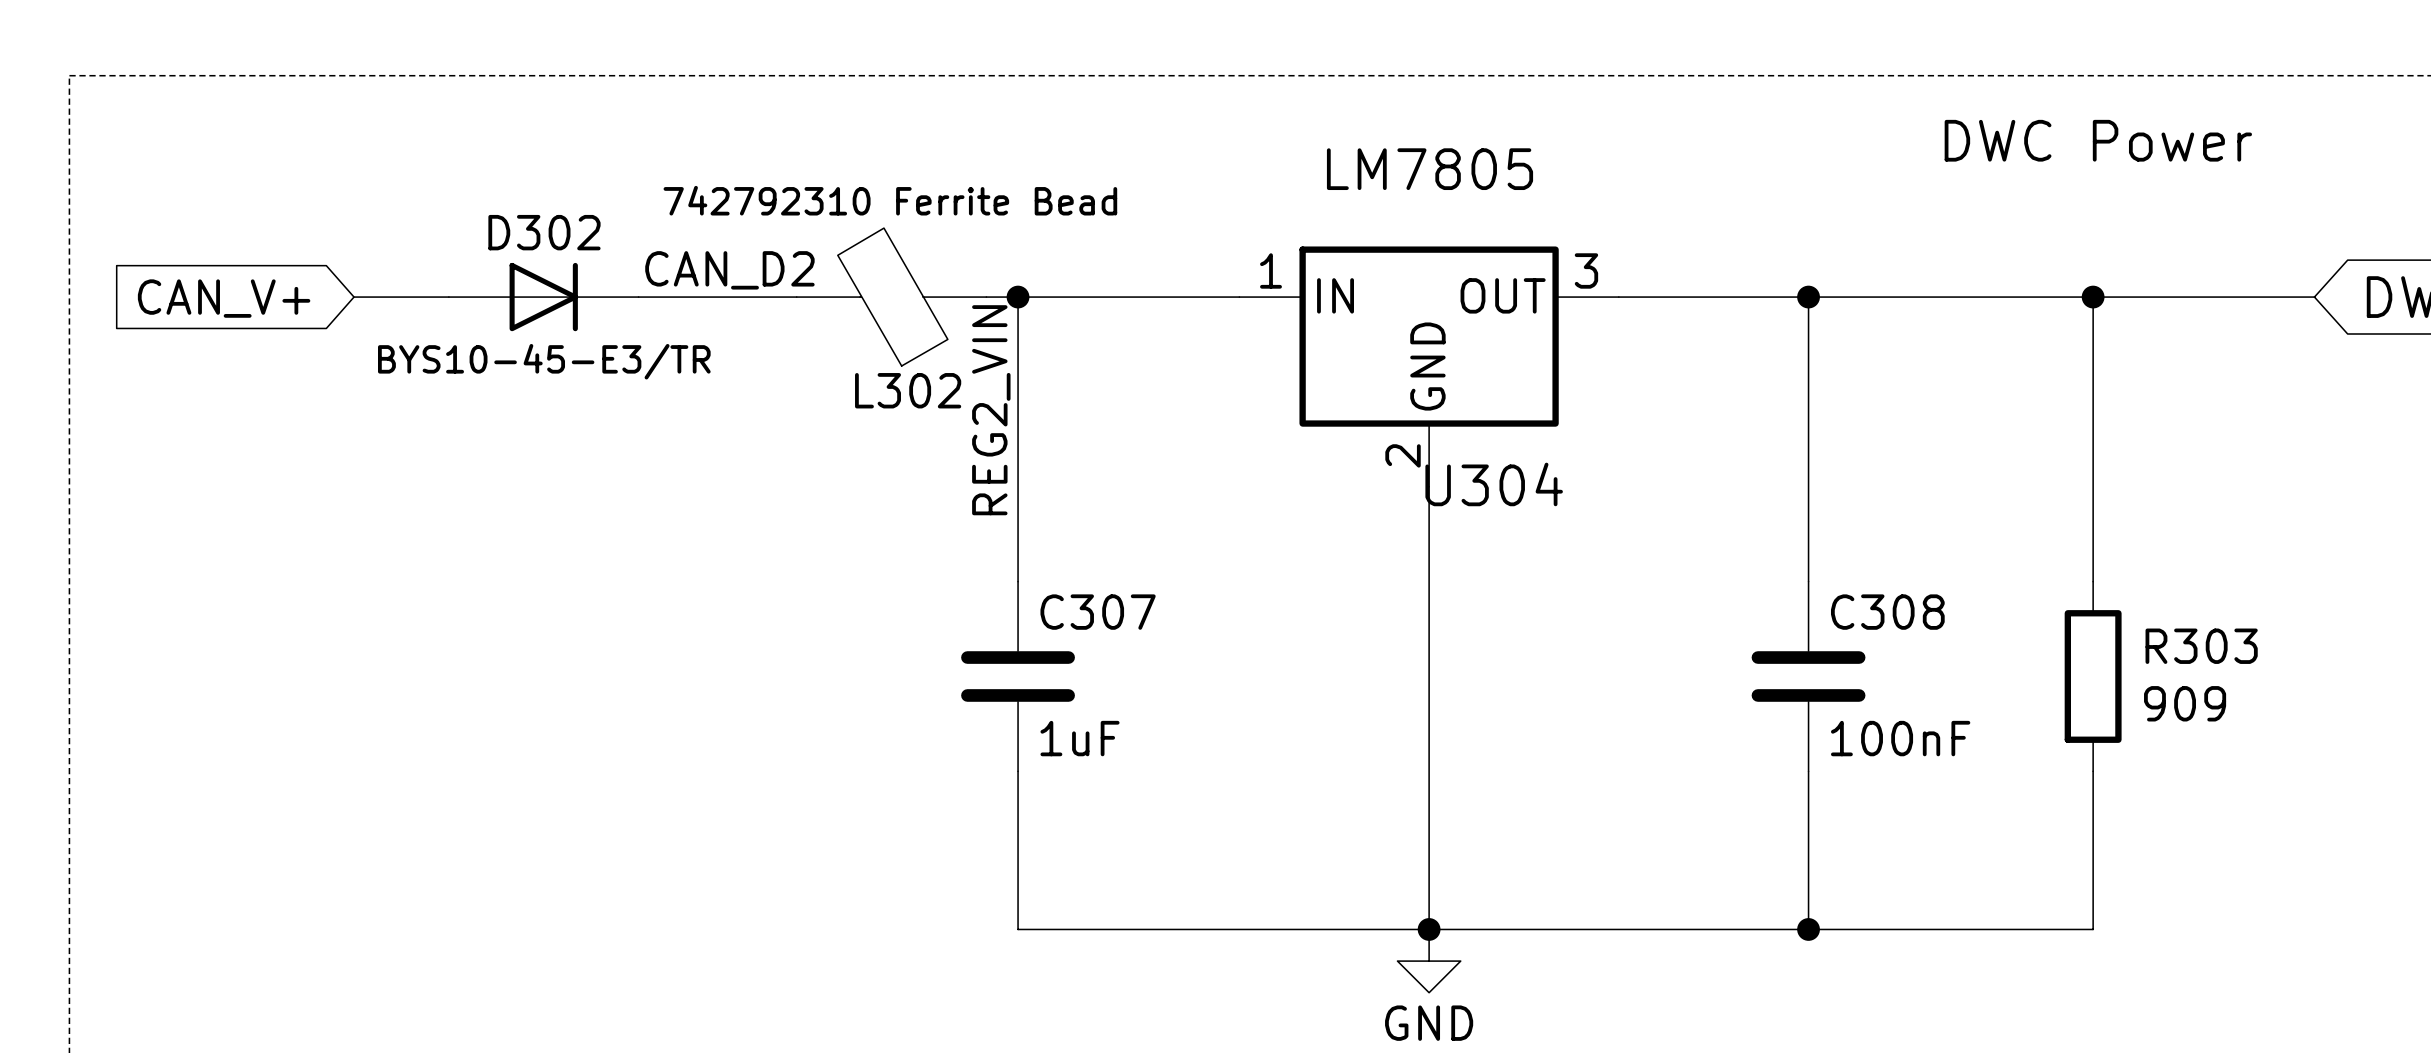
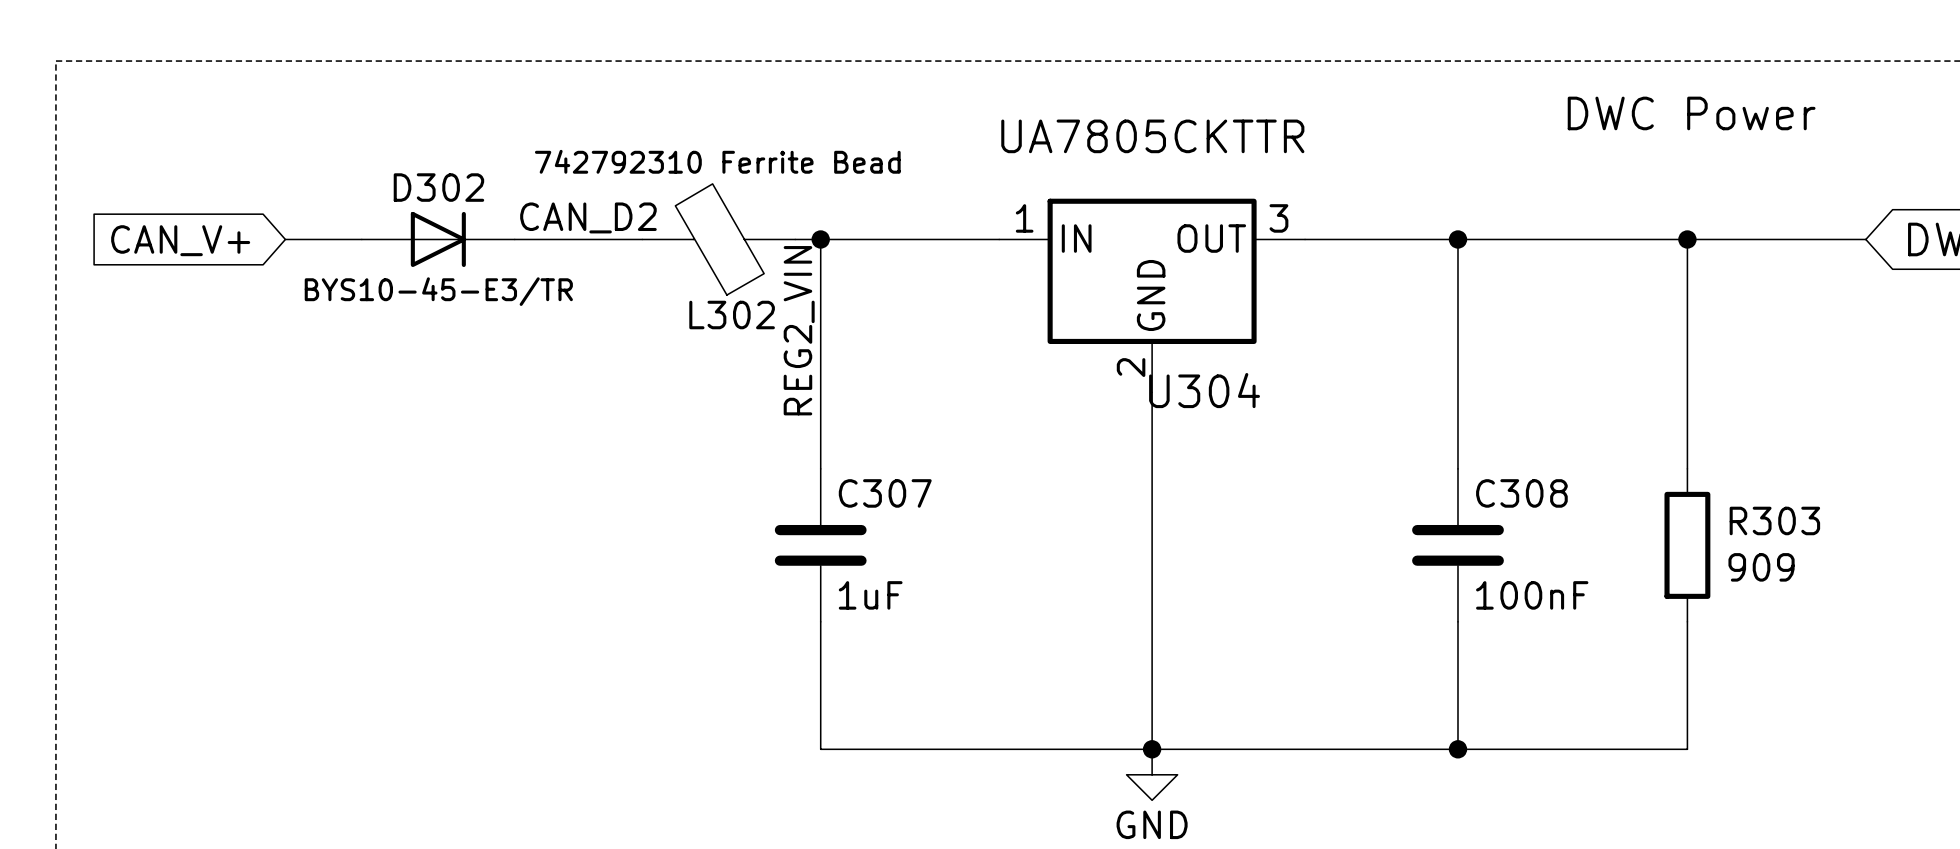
U304 value: LM7805 (1430, 169) -> UA7805CKTTR (1152, 136)

